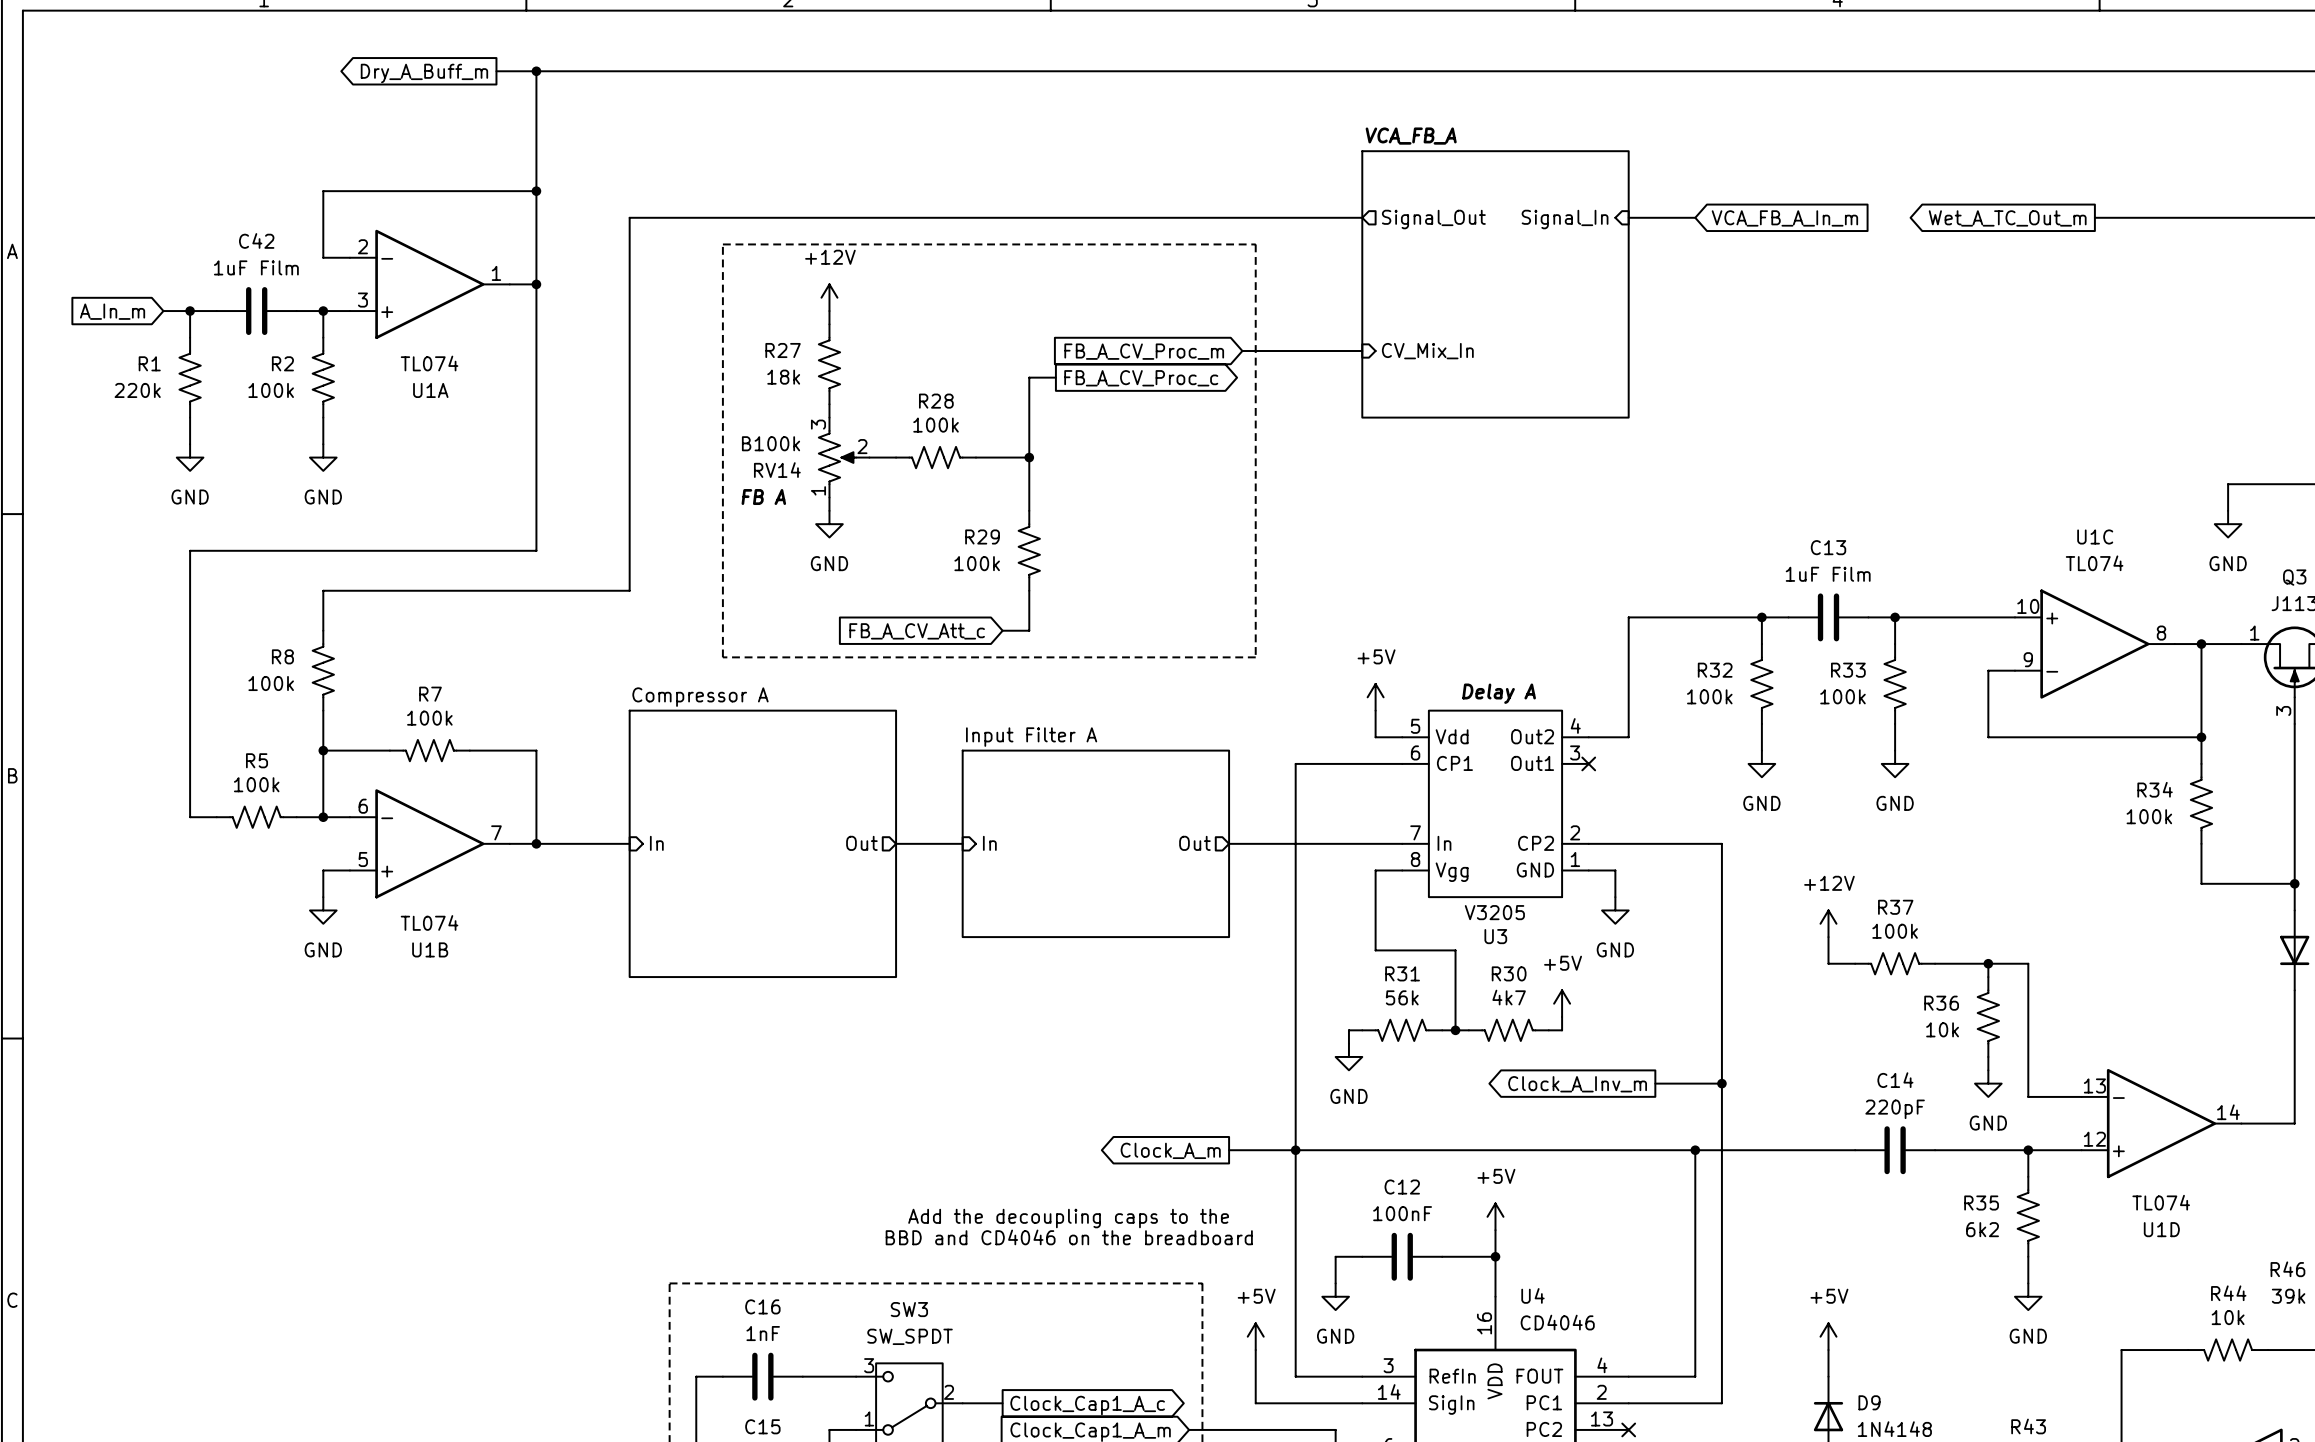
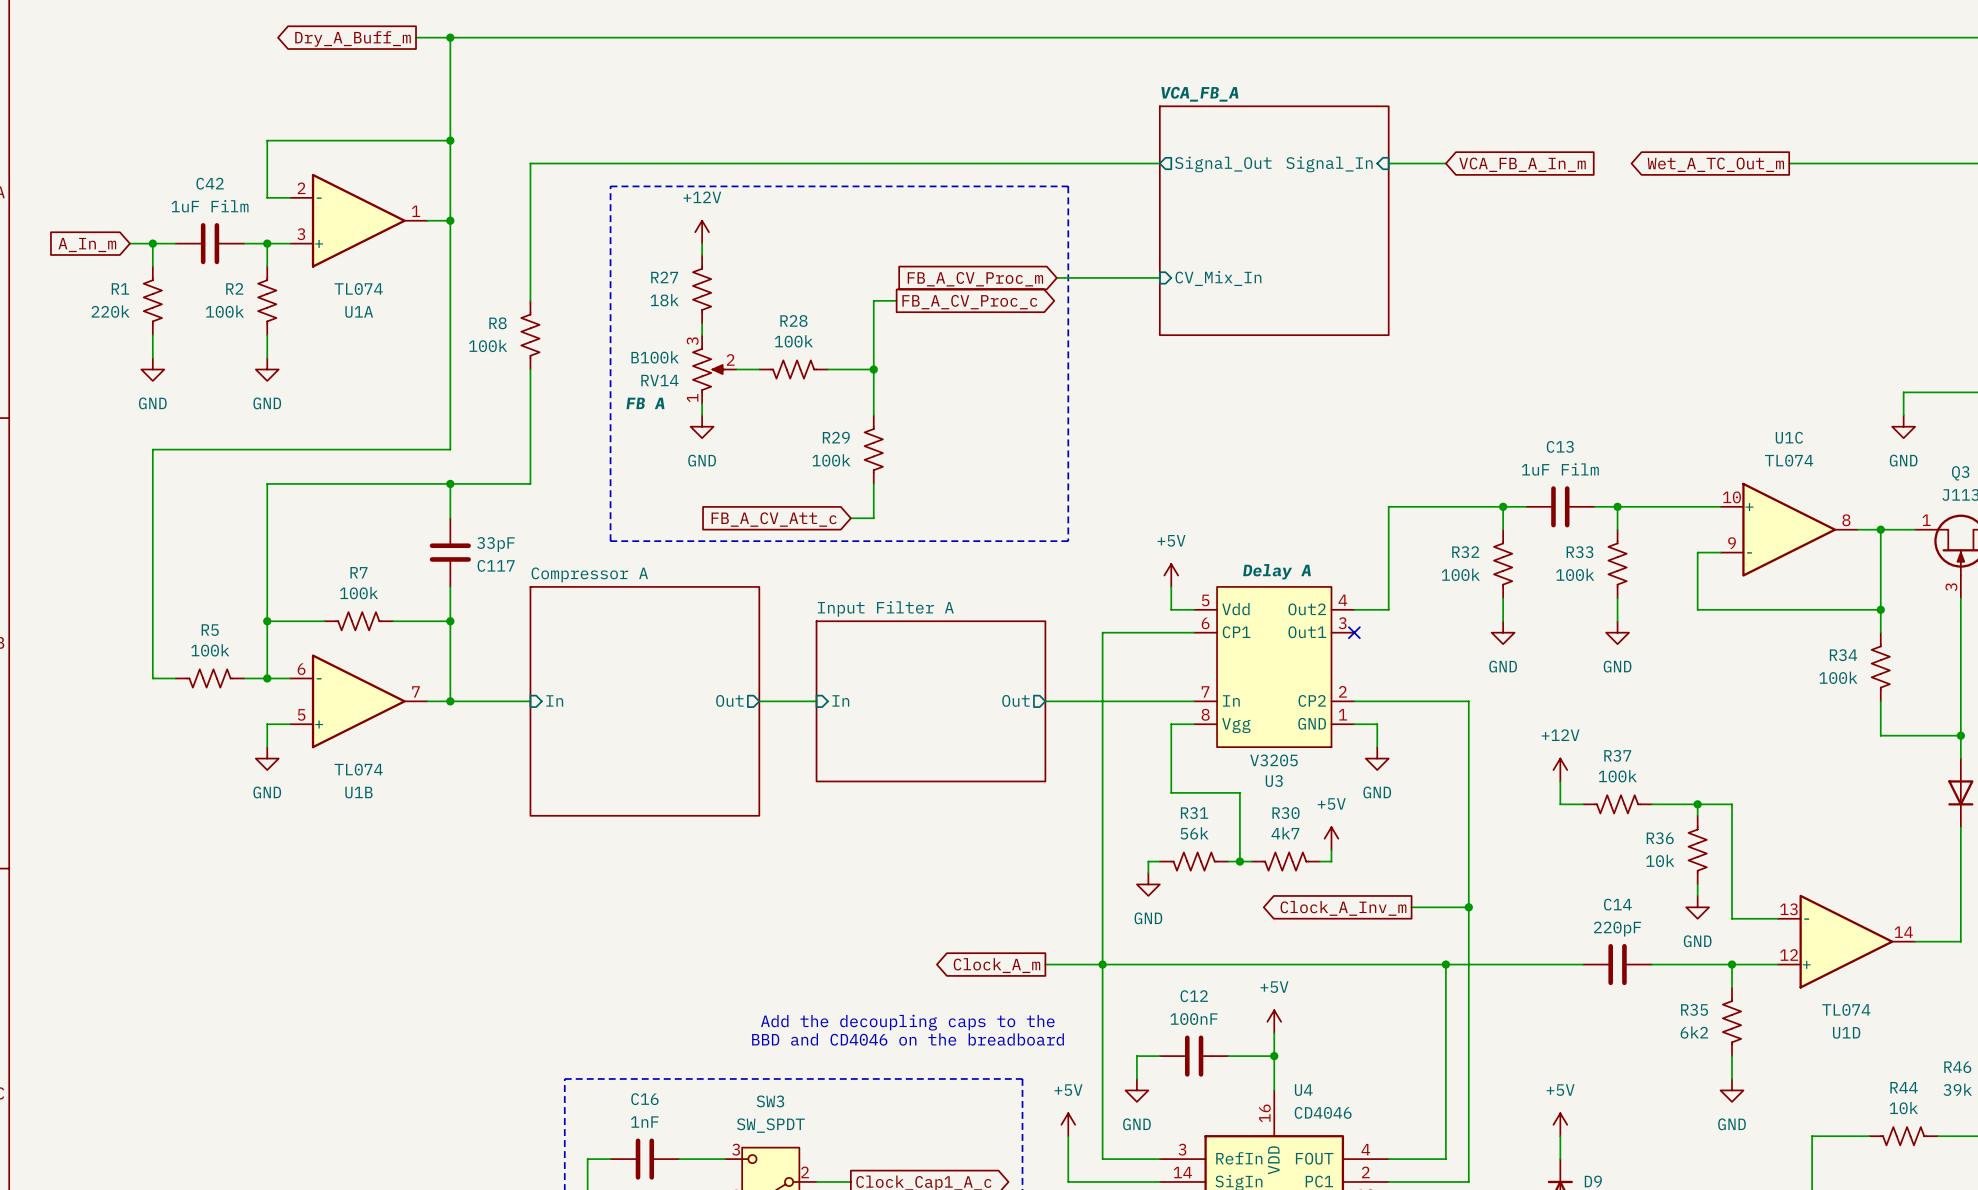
wire: none -> (450, 483) (450, 518)
junction: none -> (450, 483)
R8 position: (323, 670) -> (530, 335)
C117: none -> 33pF (450, 552)
wire: none -> (450, 586) (450, 621)
junction: none -> (450, 621)

